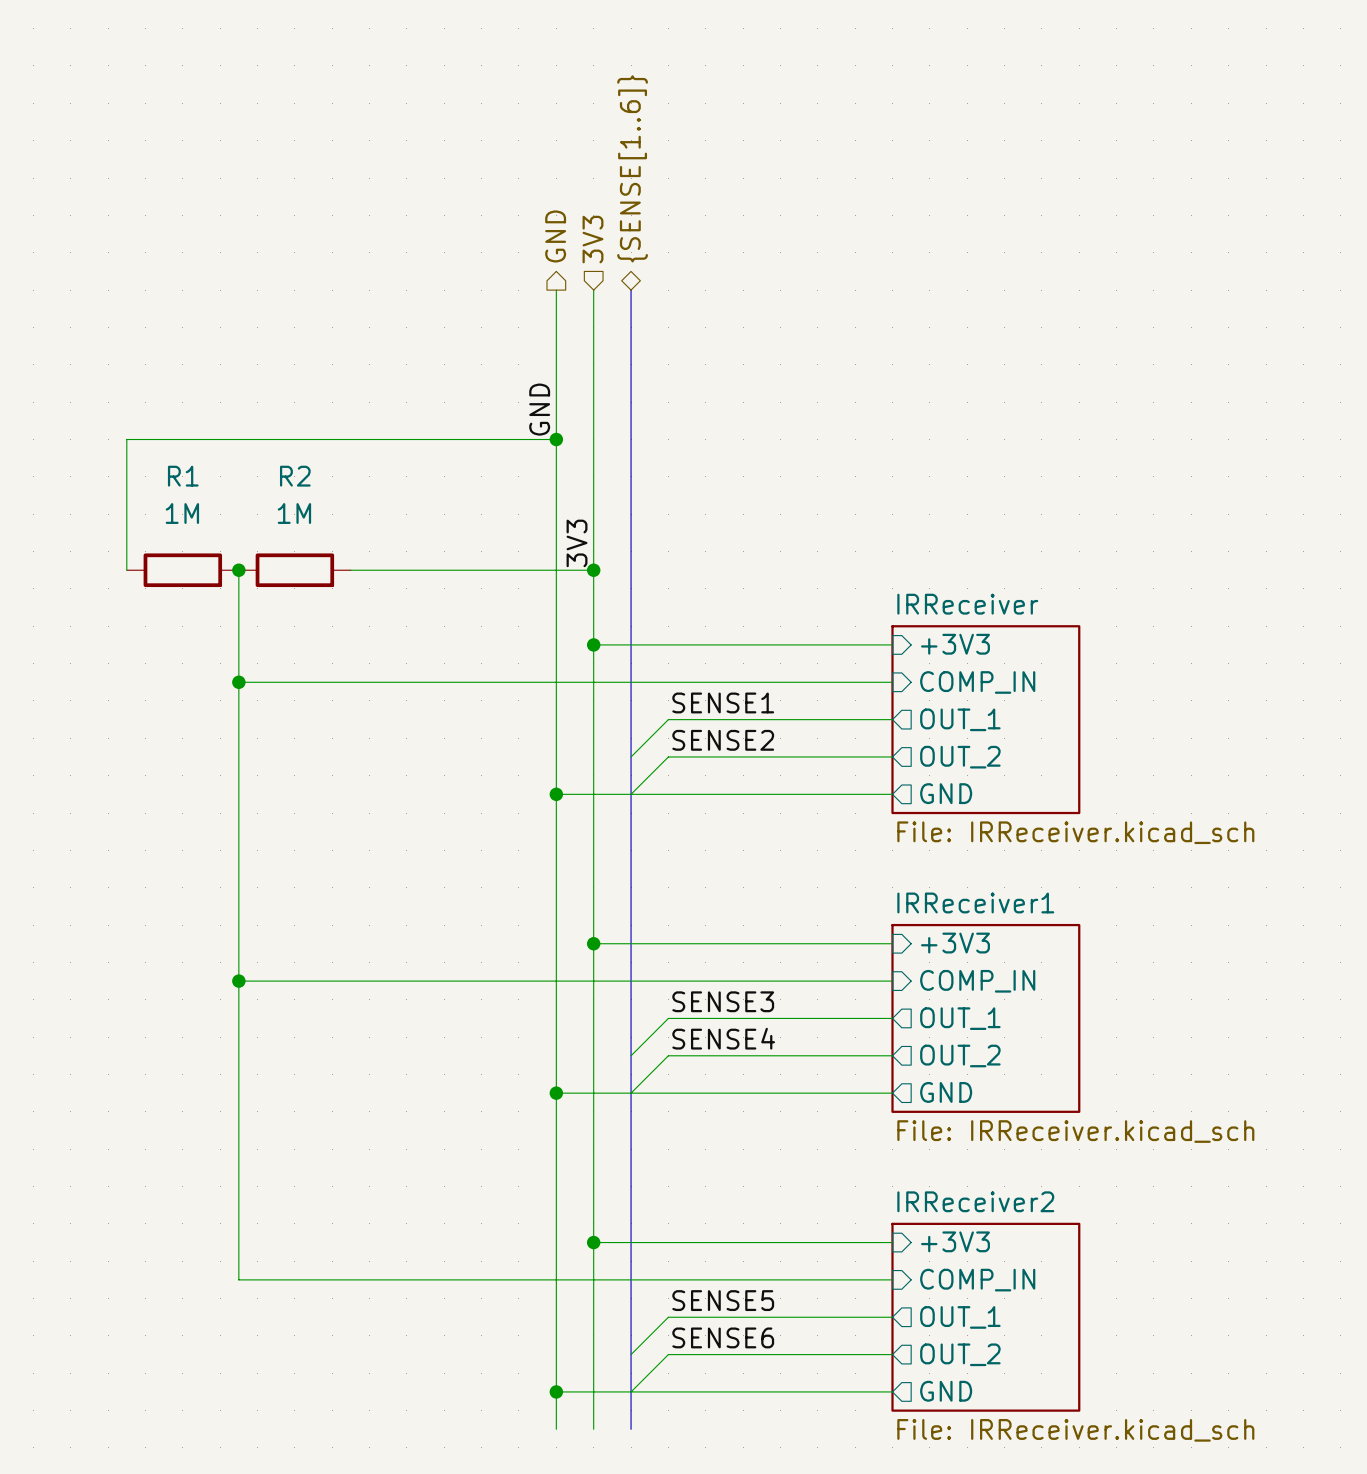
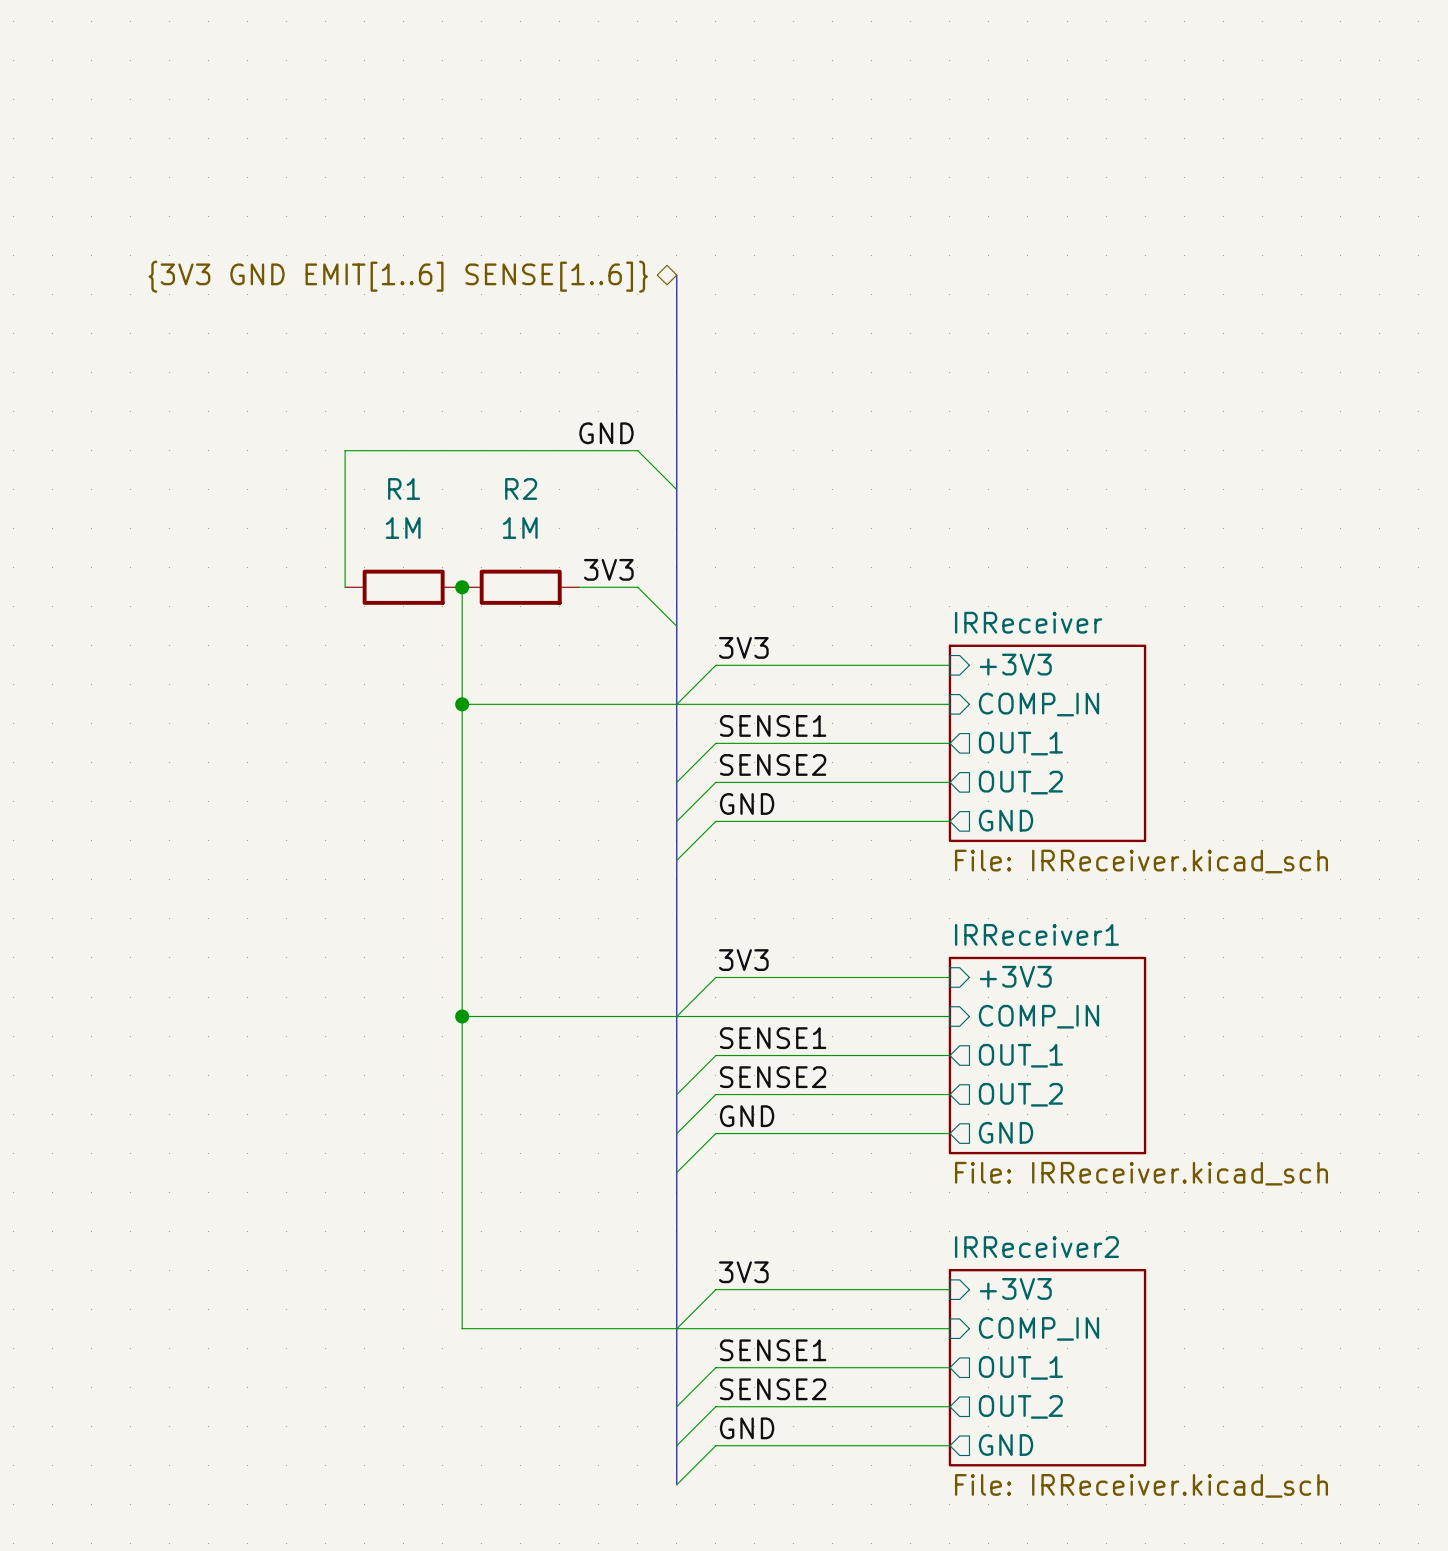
hierarchical label: {SENSE[1..6]} (632, 168) -> none
hierarchical label: GND (555, 236) -> none
hierarchical label: 3V3 (592, 239) -> none
bus: none -> (676, 275) (676, 294)
hierarchical label: none -> {3V3 GND EMIT[1..6] SENSE[1..6]} (398, 276)
wire: (556, 290) (556, 1429) -> none
wire: (593, 290) (593, 1429) -> none
label rotation: 0° (539, 409) -> 90° clockwise (606, 433)
wire: (313, 439) (126, 439) (126, 570) -> (345, 450) (345, 587)
wire: none -> (598, 450) (637, 450) (676, 489)
junction: (556, 439) -> none
label rotation: 0° (577, 543) -> 90° clockwise (608, 569)
R1 position: (182, 570) -> (403, 587)
wire: (238, 570) (238, 1279) (425, 1279) -> (462, 587) (462, 1328)
junction: (238, 570) -> none
R2 position: (294, 570) -> (520, 587)
wire: (350, 570) (537, 570) -> none
junction: none -> (462, 587)
wire: none -> (637, 587) (676, 626)
junction: (593, 570) -> none
label: none -> 3V3 (743, 647)
wire: (593, 644) (668, 644) -> (676, 704) (715, 665)
junction: (593, 644) -> none
wire: (238, 682) (425, 682) -> none
junction: (238, 682) -> none
junction: none -> (462, 704)
label: none -> GND (747, 803)
wire: (556, 794) (668, 794) -> (676, 860) (715, 821)
junction: (556, 794) -> none
label: none -> 3V3 (743, 960)
wire: (593, 943) (668, 943) -> (676, 1016) (715, 977)
junction: (593, 943) -> none
wire: (238, 981) (425, 981) -> none
junction: (238, 981) -> none
junction: none -> (462, 1016)
label: SENSE3 (723, 1001) -> SENSE1 (773, 1038)
label: SENSE4 (723, 1038) -> SENSE2 (773, 1077)
label: none -> GND (747, 1116)
wire: (556, 1093) (668, 1093) -> (676, 1172) (715, 1133)
junction: (556, 1093) -> none
label: none -> 3V3 (743, 1272)
wire: (593, 1242) (668, 1242) -> (676, 1328) (715, 1289)
junction: (593, 1242) -> none
label: SENSE5 (723, 1300) -> SENSE1 (773, 1350)
label: SENSE6 (723, 1337) -> SENSE2 (773, 1389)
label: none -> GND (747, 1428)
wire: (556, 1391) (668, 1391) -> (676, 1484) (715, 1445)
junction: (556, 1391) -> none

